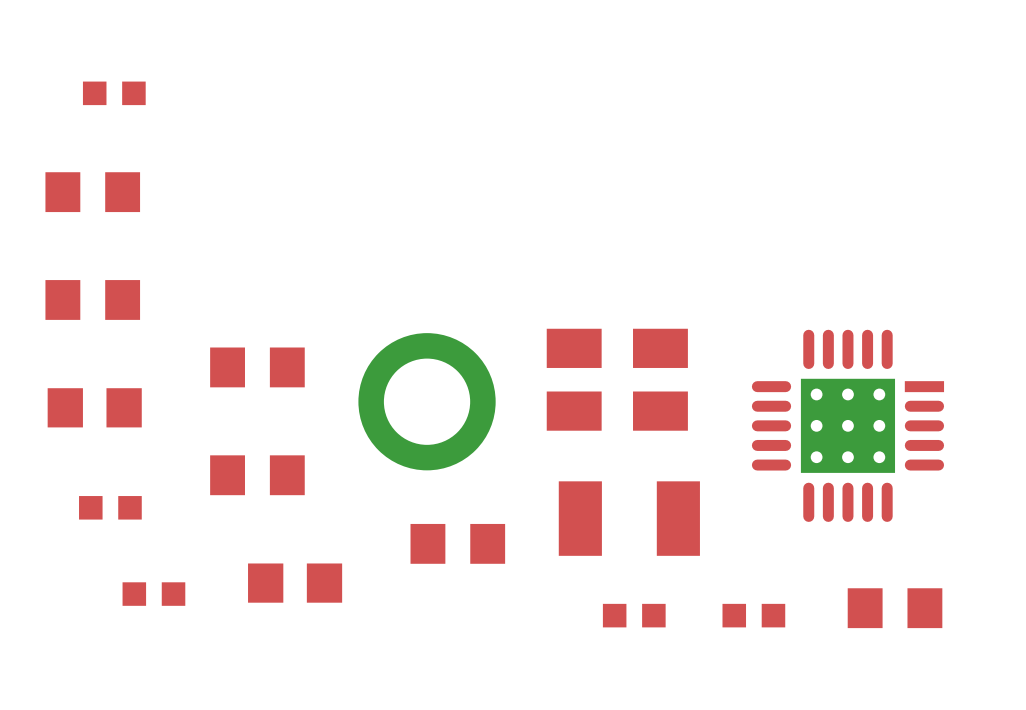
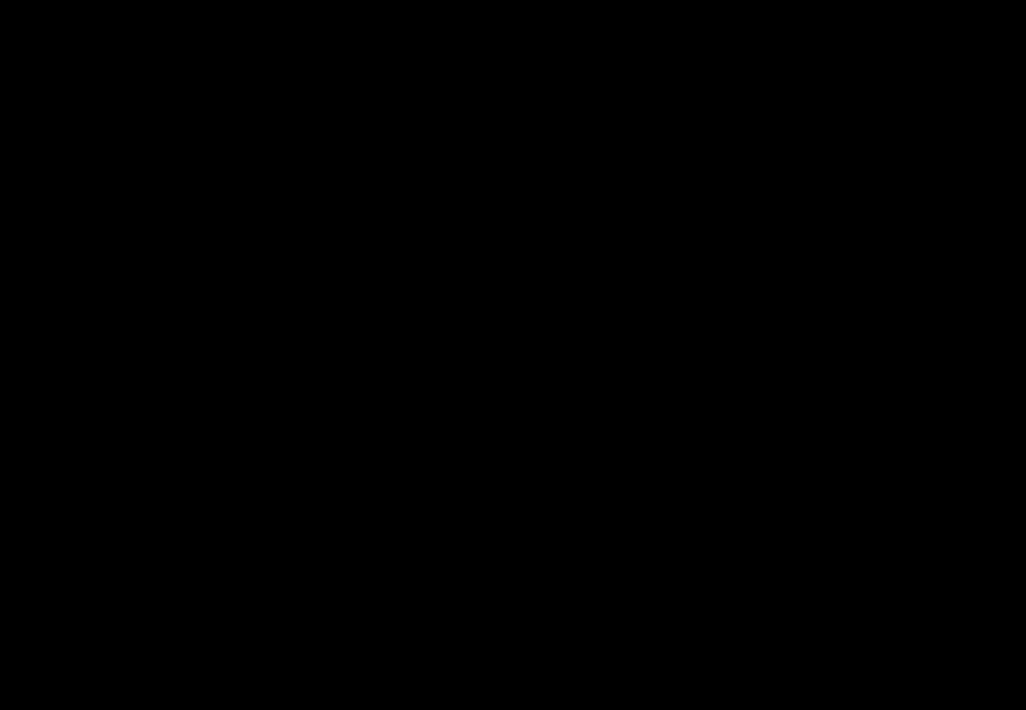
part: (114, 93) -> none
part: (92, 192) -> none
part: (92, 299) -> none
part: (257, 367) -> none
part: (617, 379) -> none
part: (427, 401) -> none
part: (94, 407) -> none
part: (847, 425) -> none
part: (257, 475) -> none
part: (110, 507) -> none
part: (629, 518) -> none
part: (457, 543) -> none
part: (295, 583) -> none
part: (153, 594) -> none
part: (895, 608) -> none
part: (634, 615) -> none
part: (753, 615) -> none

